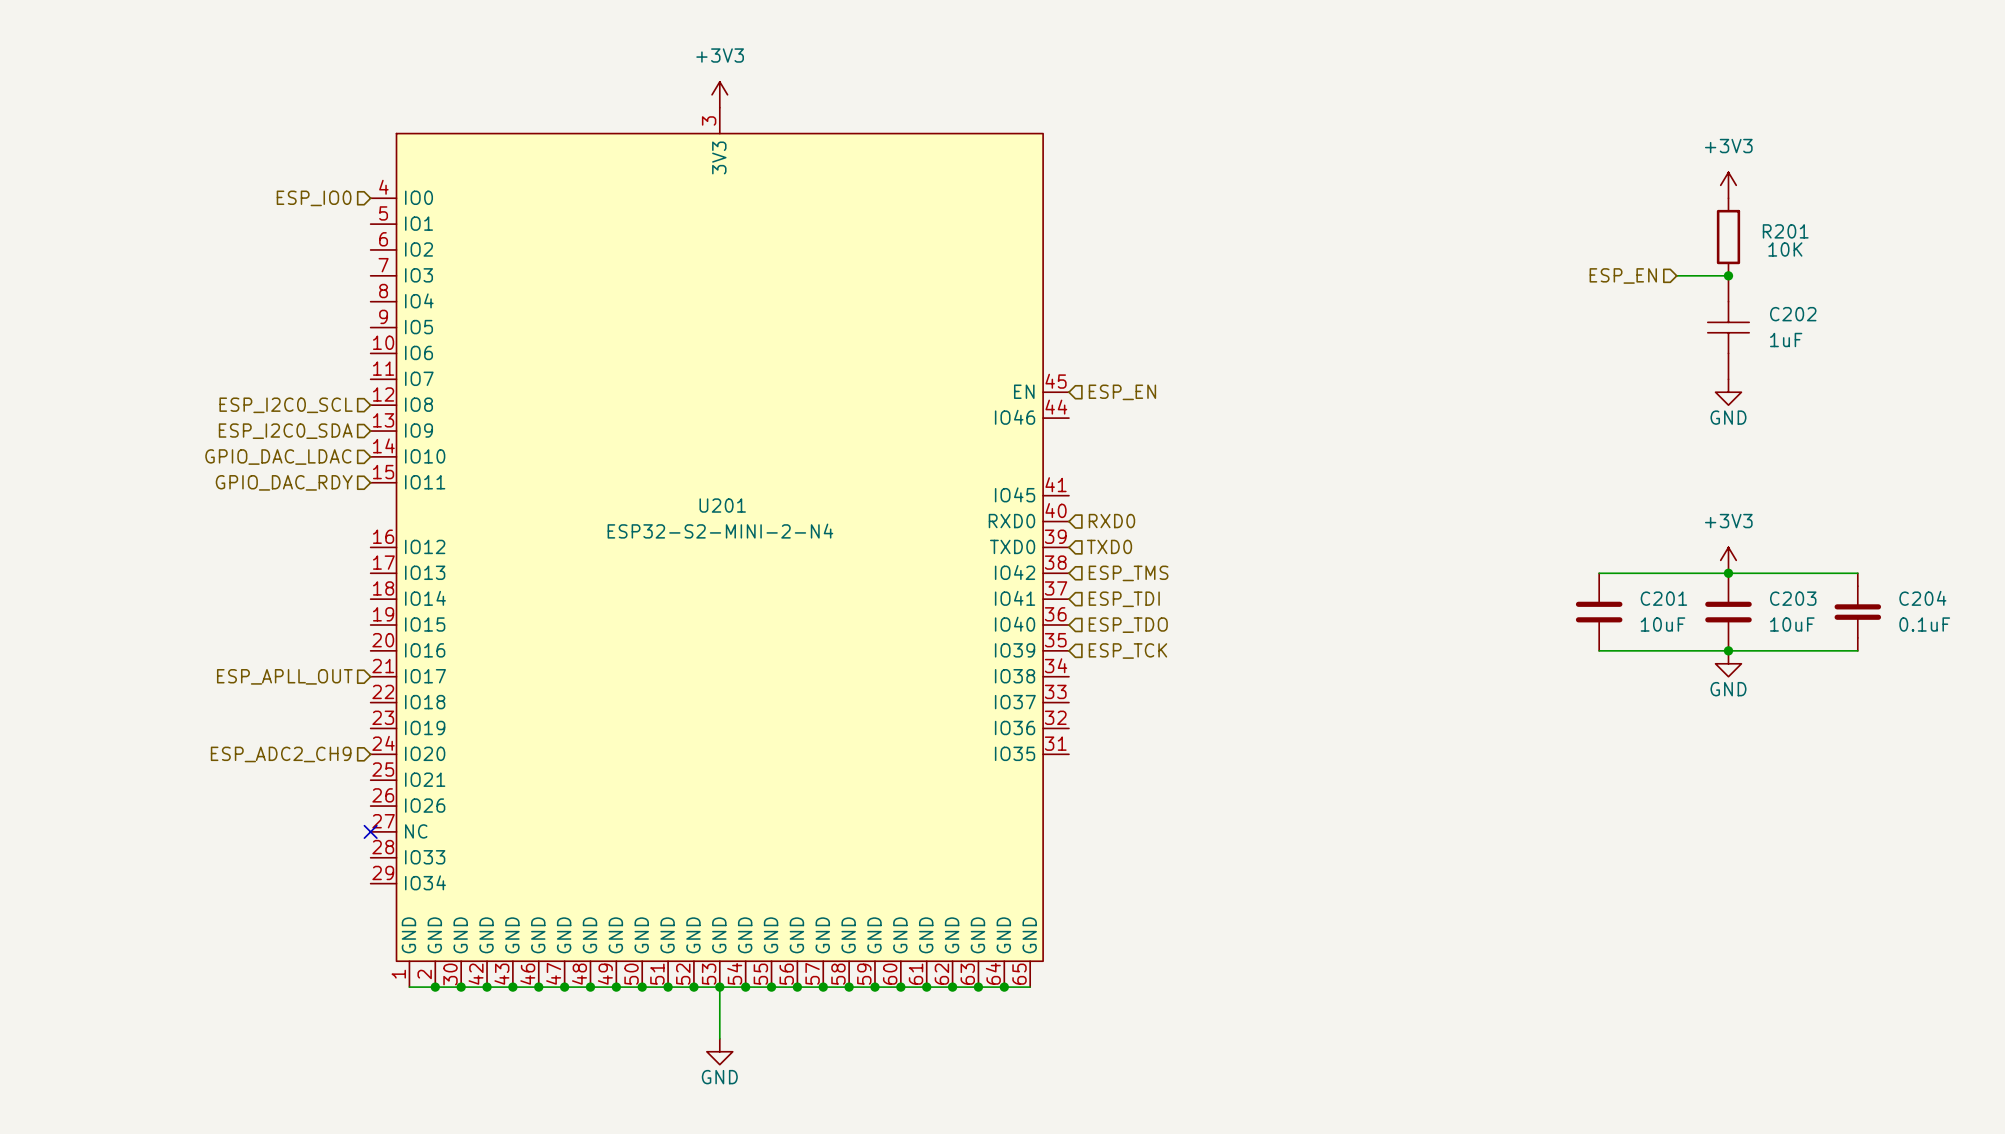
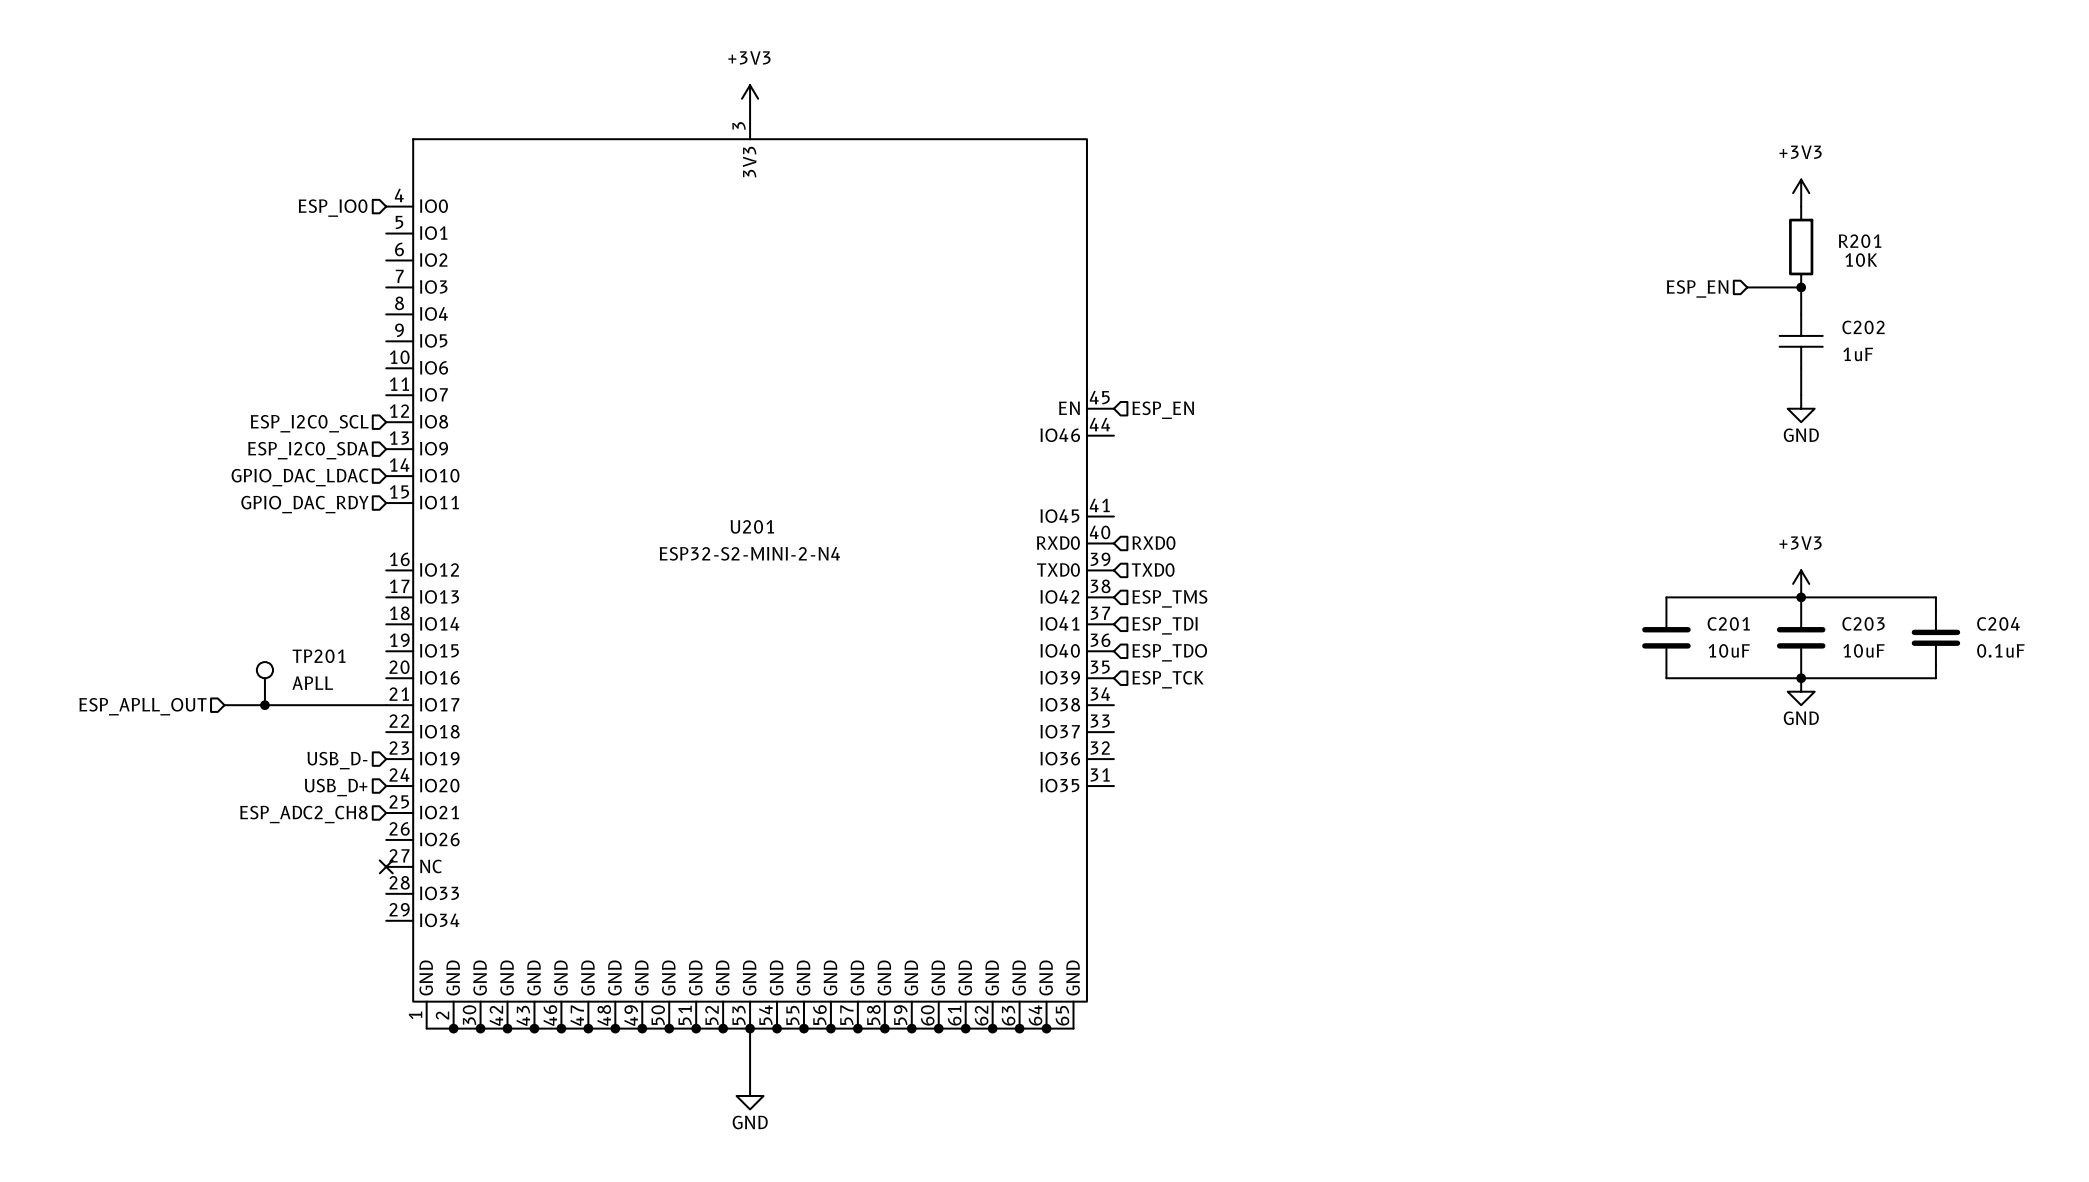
TP201: none -> APLL (264, 683)
wire: none -> (224, 705) (386, 705)
junction: none -> (264, 705)
hierarchical label position: ESP_APLL_OUT (284, 676) -> ESP_APLL_OUT (143, 706)
hierarchical label: none -> USB_D- (337, 760)
hierarchical label: ESP_ADC2_CH9 (281, 754) -> USB_D+ (336, 787)
hierarchical label: none -> ESP_ADC2_CH8 (303, 814)

